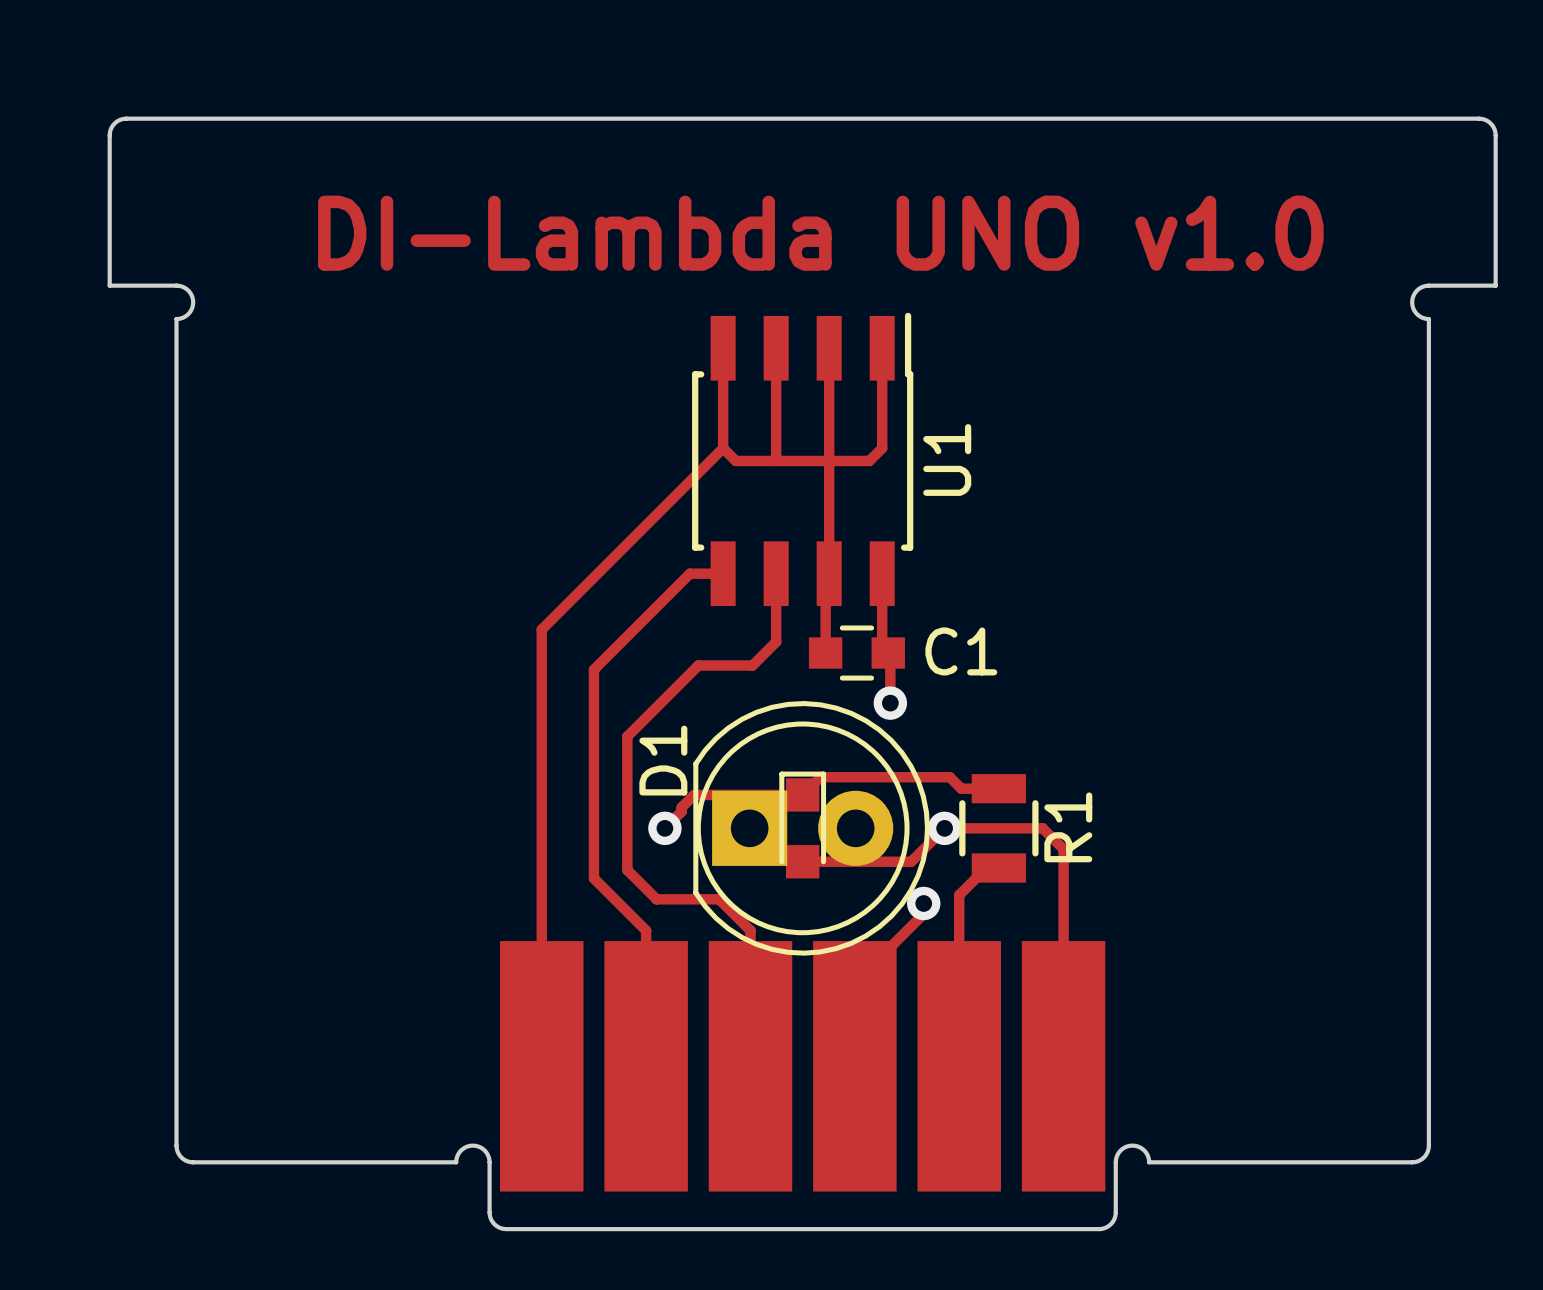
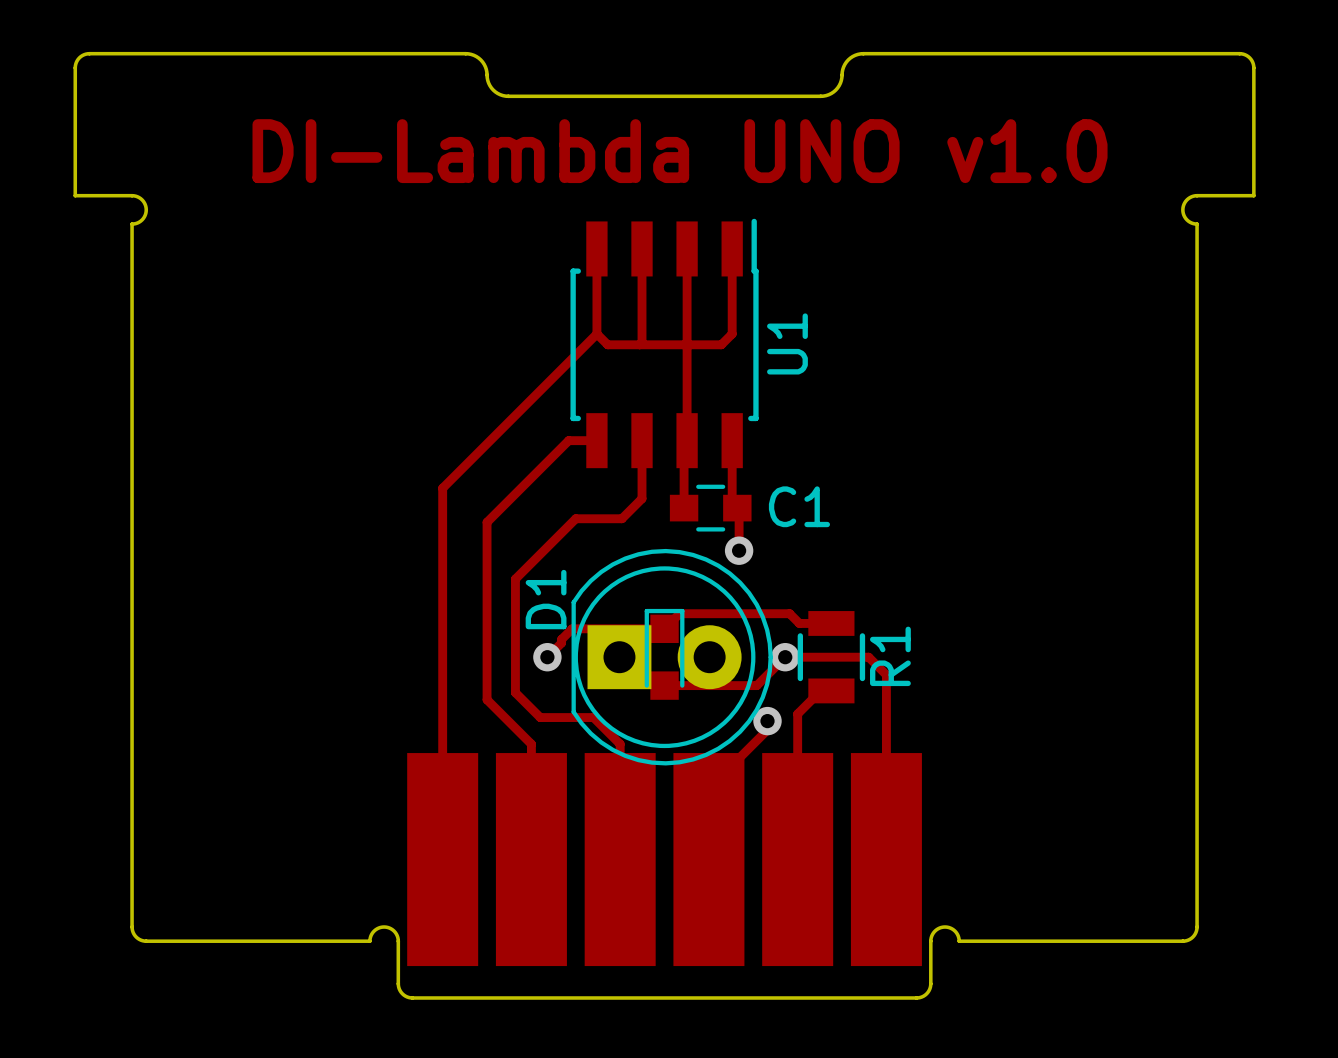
board edge: (568, 118) (1036, 118) -> (465, 53) (473, 55) (482, 62) (488, 83) (493, 90) (500, 94) (508, 96) (823, 96) (831, 93) (837, 87) (843, 66) (848, 59) (855, 55) (863, 53)

